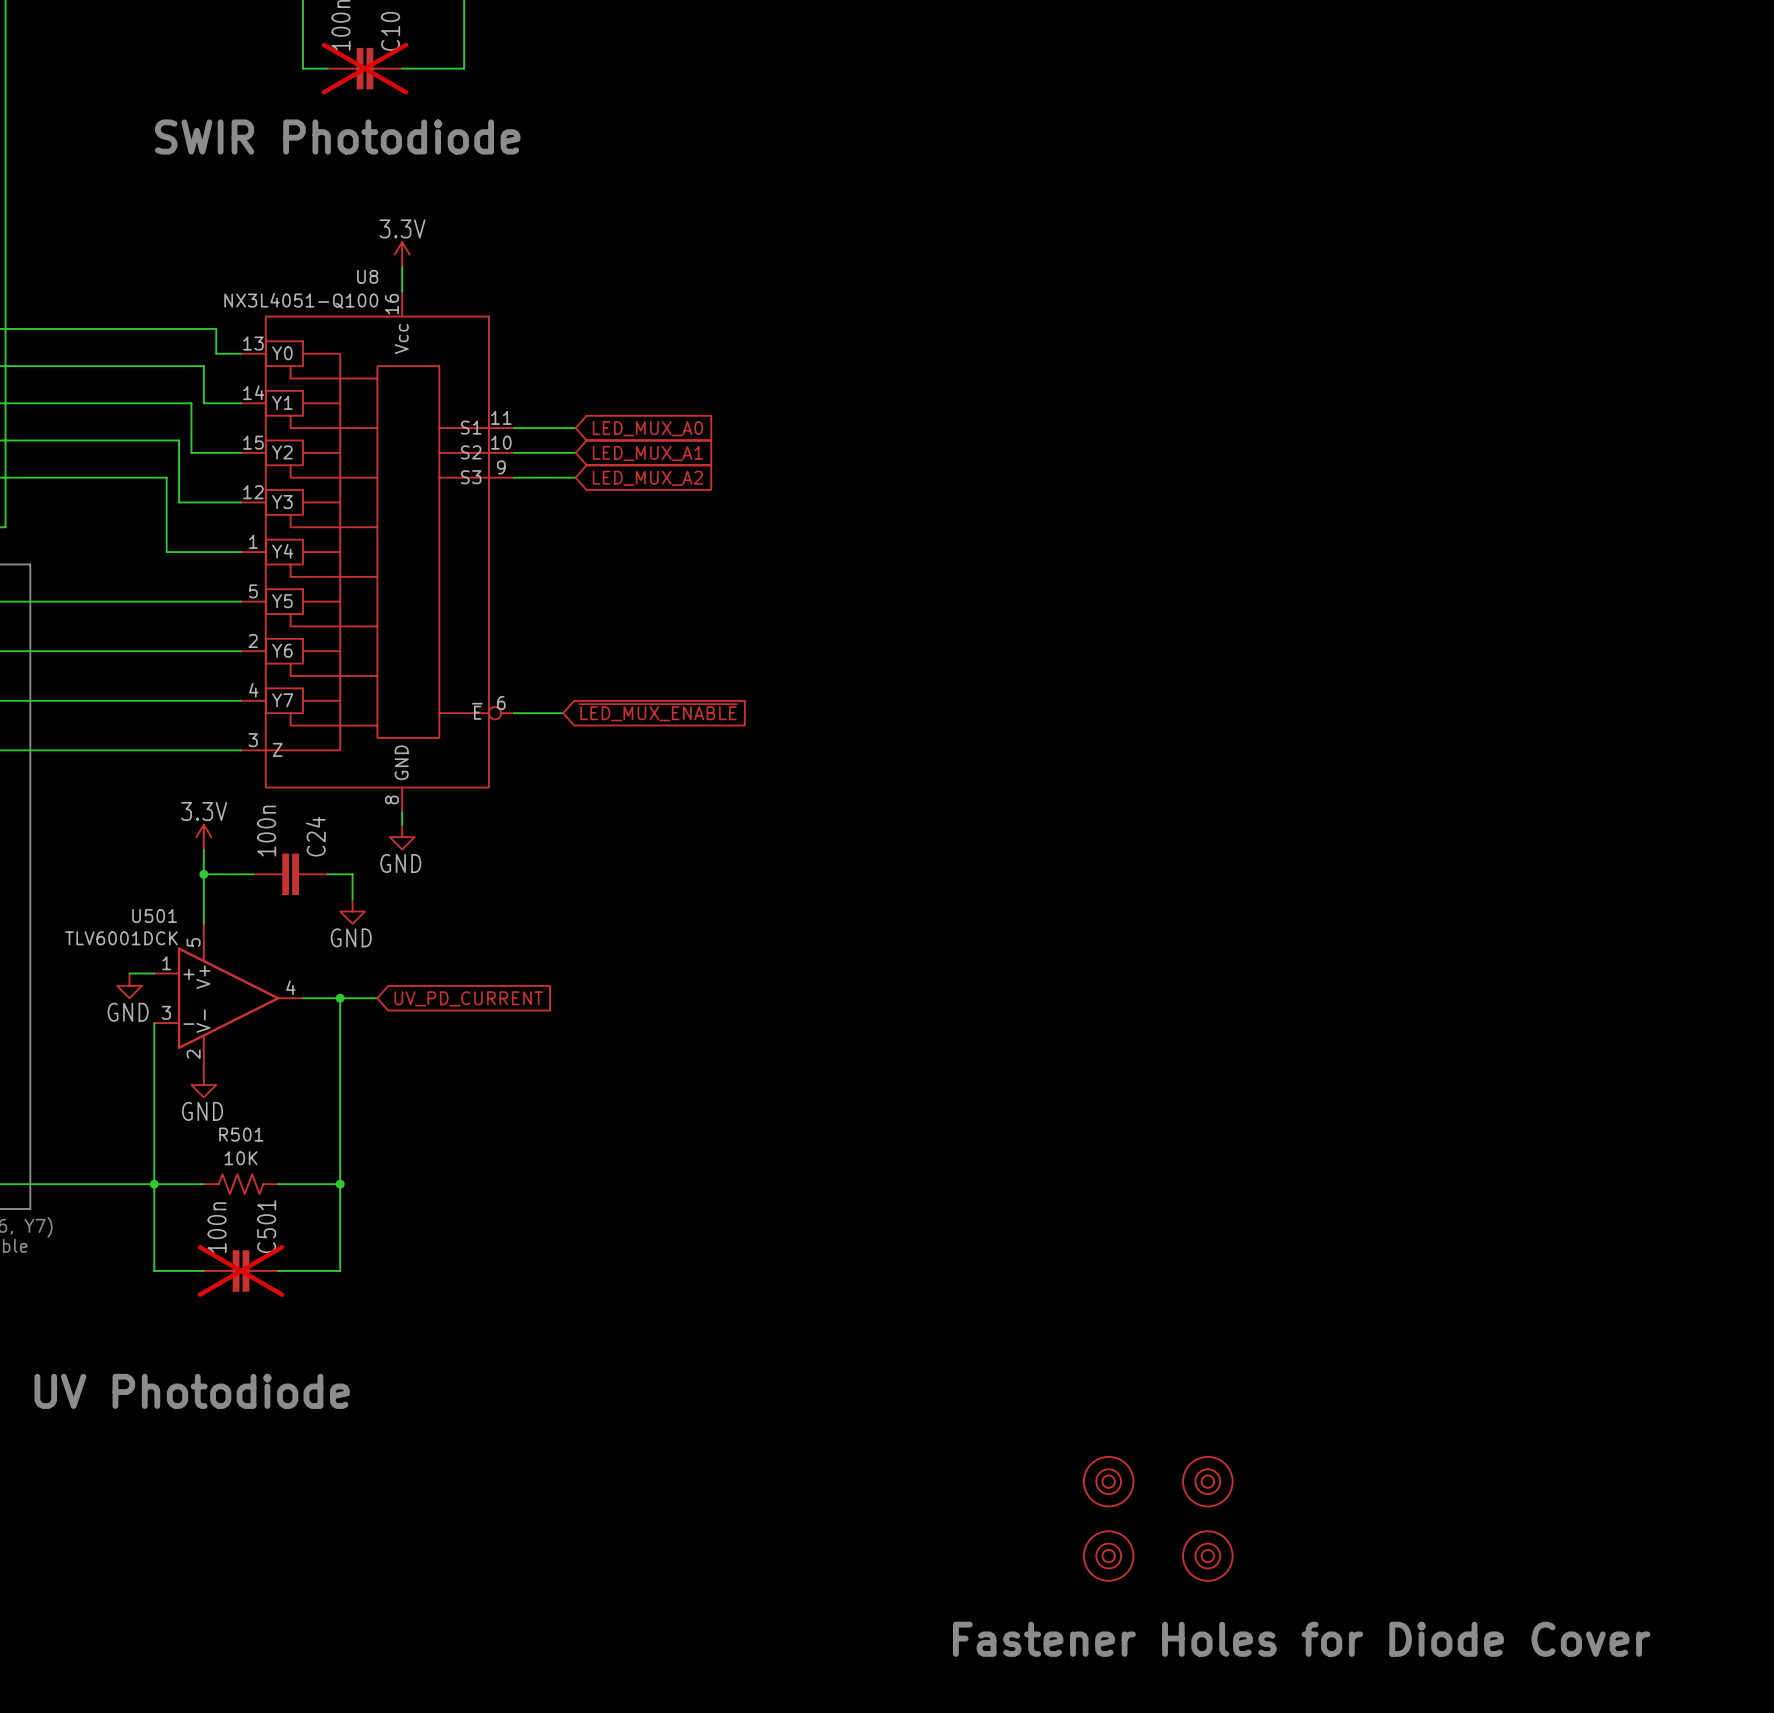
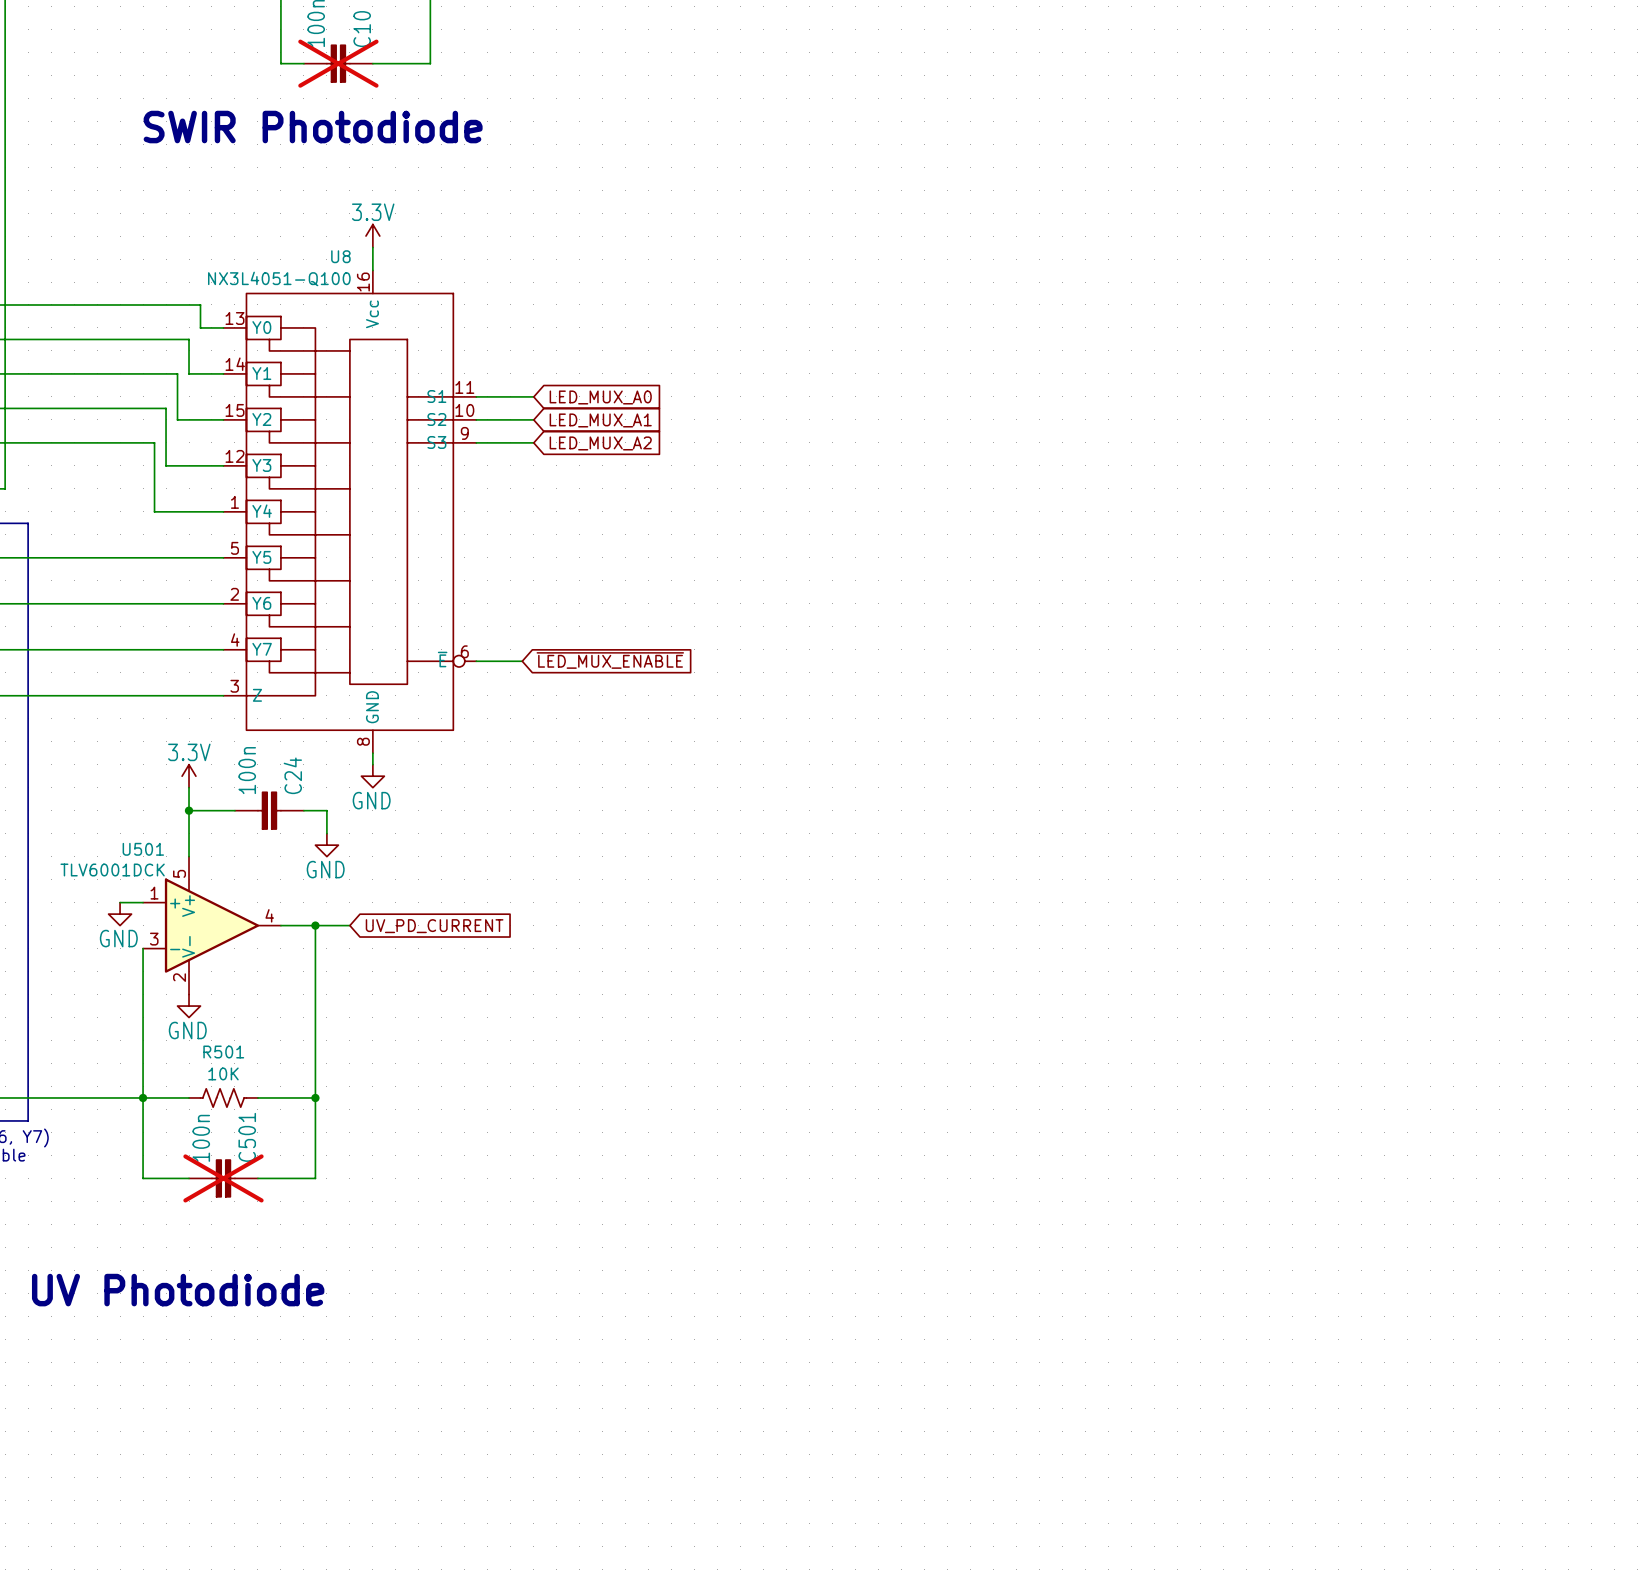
part: (1108, 1481) -> none
part: (1207, 1481) -> none
part: (1108, 1556) -> none
part: (1207, 1556) -> none
text: Fastener Holes for Diode Cover (1301, 1639) -> none

